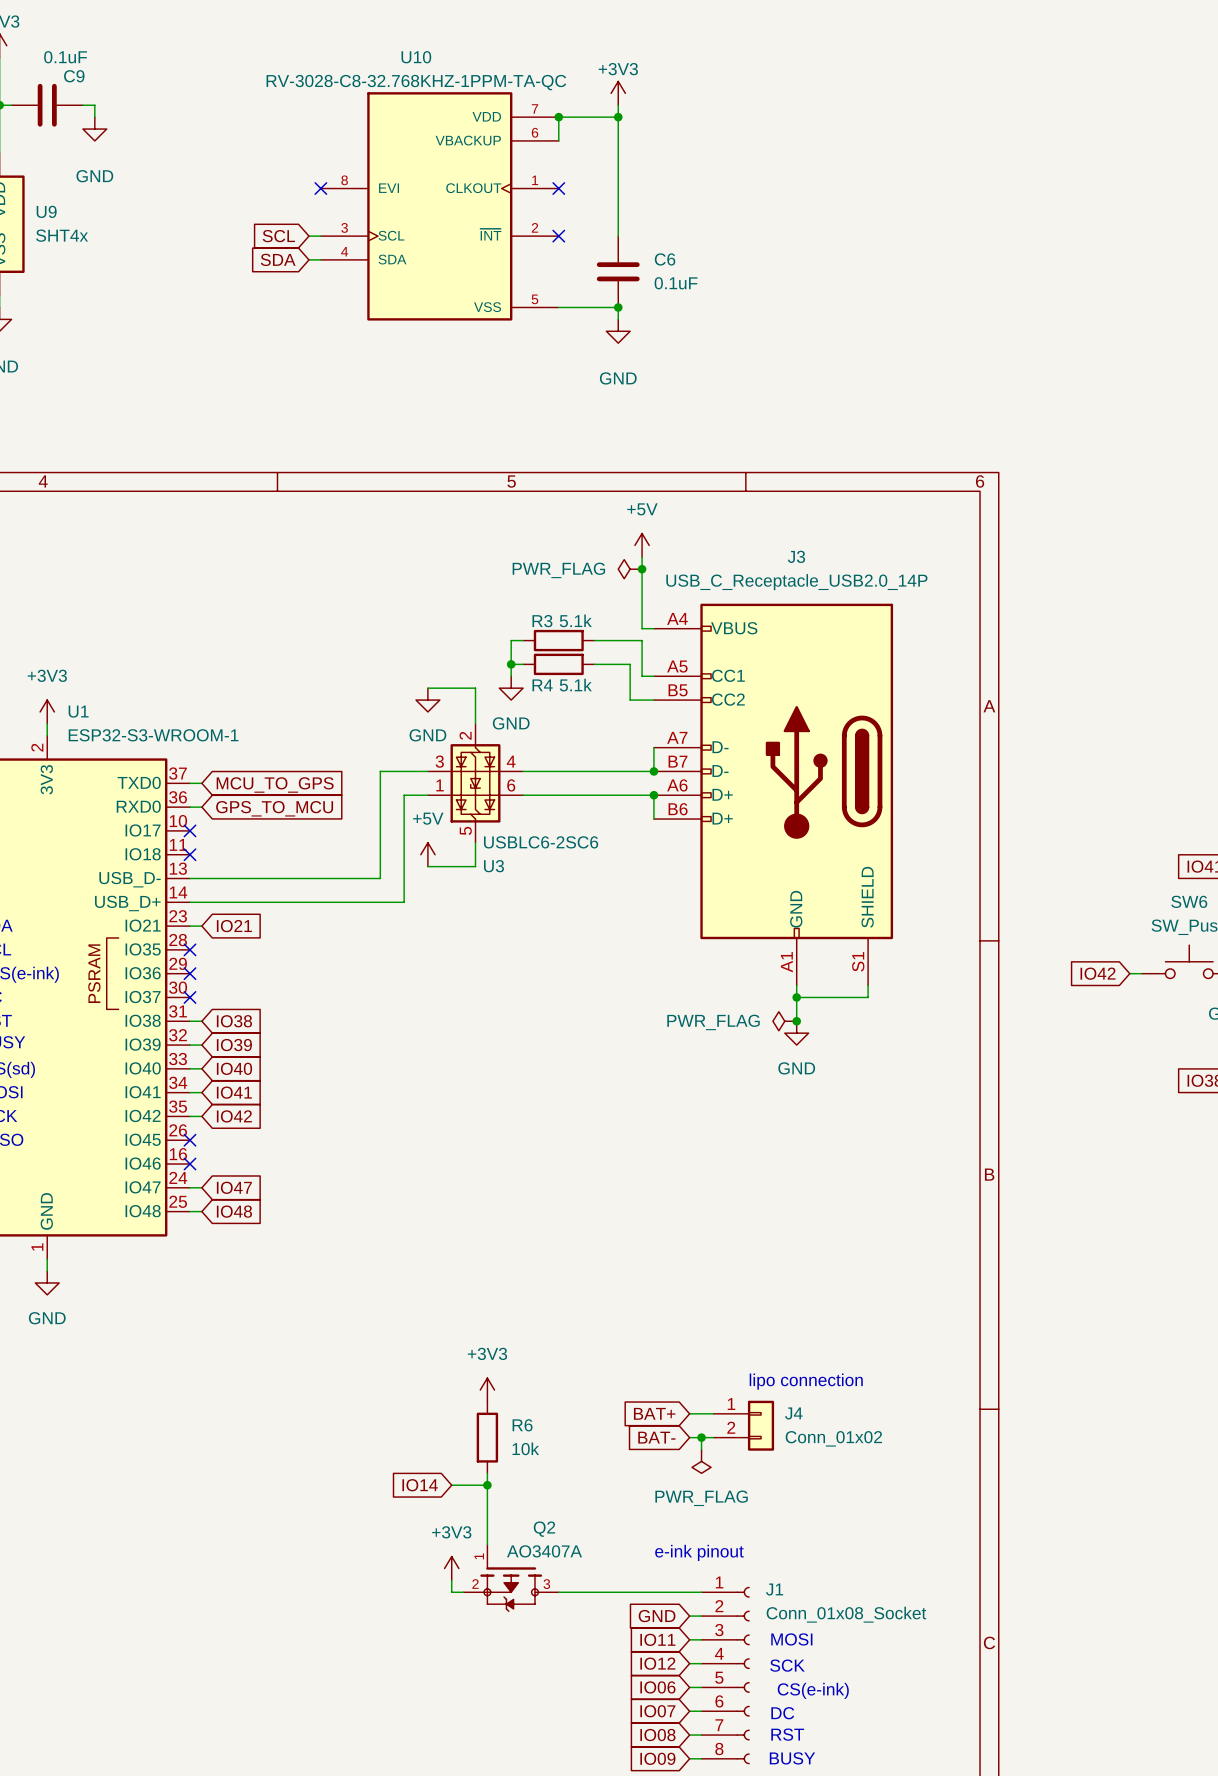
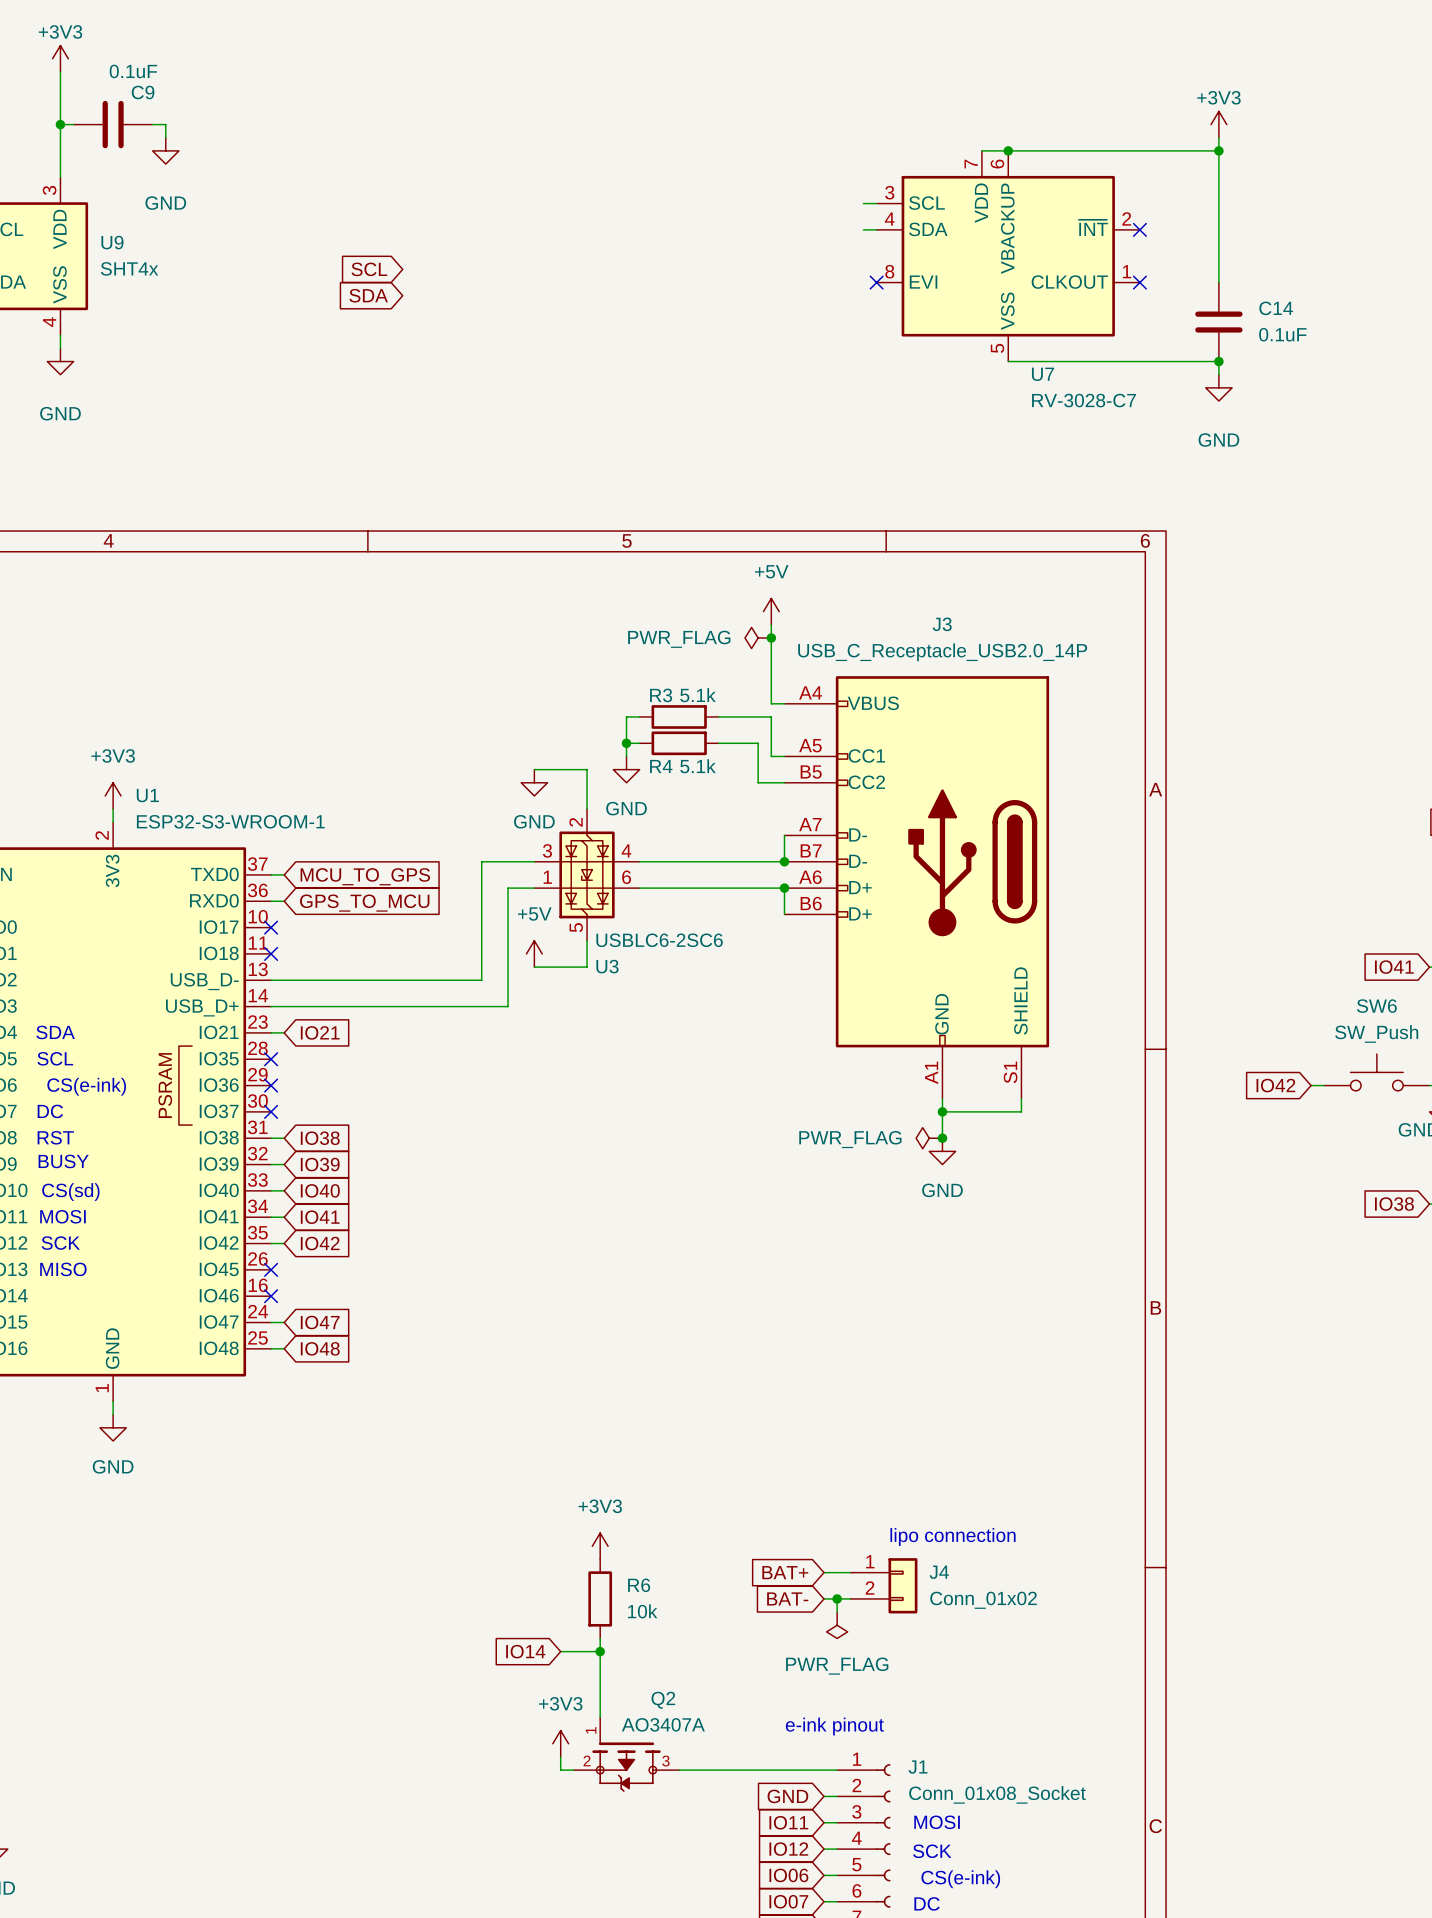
power symbol: +3V3 (618, 93) -> none
wire: (618, 105) (618, 236) -> none
power symbol: none -> +3V3 (1218, 124)
junction: (558, 117) -> none
wire: (618, 117) (558, 117) (558, 140) -> none
junction: (618, 117) -> none
wire: none -> (1218, 137) (1218, 282)
wire: none -> (981, 150) (1218, 150)
junction: none -> (1008, 150)
junction: none -> (1218, 150)
wire: none -> (863, 203) (876, 203)
no-connect mark: (320, 188) -> none
no-connect mark: (558, 188) -> none
wire: none -> (863, 229) (876, 229)
no-connect mark: none -> (1139, 229)
U10: RV-3028-C8-32.768KHZ-1PPM-TA-QC (439, 206) -> none
U7: none -> RV-3028-C7 (1008, 256)
wire: (308, 236) (320, 236) -> none
no-connect mark: (558, 236) -> none
no-connect mark: none -> (876, 282)
no-connect mark: none -> (1139, 282)
wire: (308, 259) (320, 259) -> none
C6: 0.1uF (618, 271) -> none
C14: none -> 0.1uF (1218, 322)
wire: (558, 307) (618, 307) (618, 319) -> none
junction: (618, 307) -> none
wire: none -> (1008, 361) (1218, 361) (1218, 374)
junction: none -> (1218, 361)
power symbol: GND (618, 331) -> none
power symbol: none -> GND (1218, 387)

